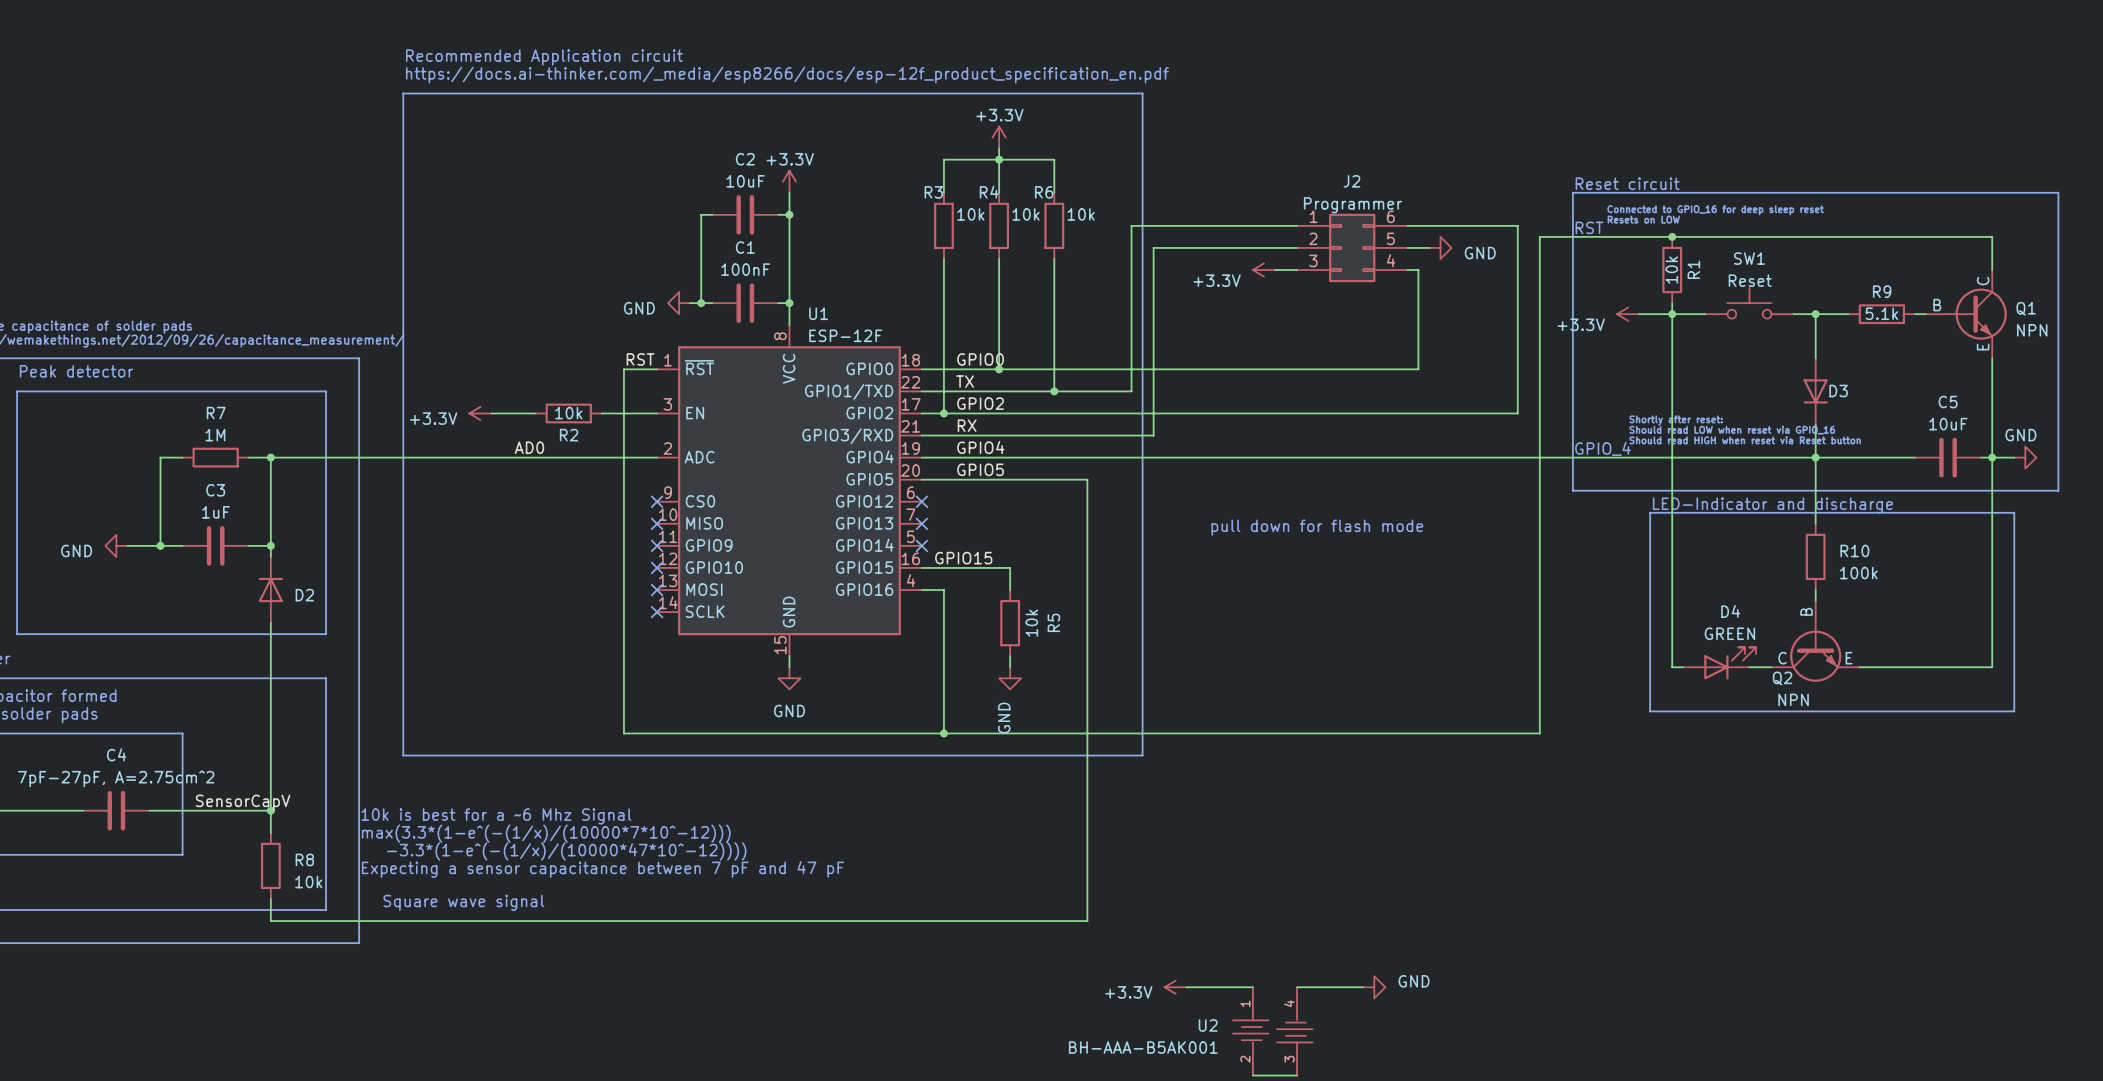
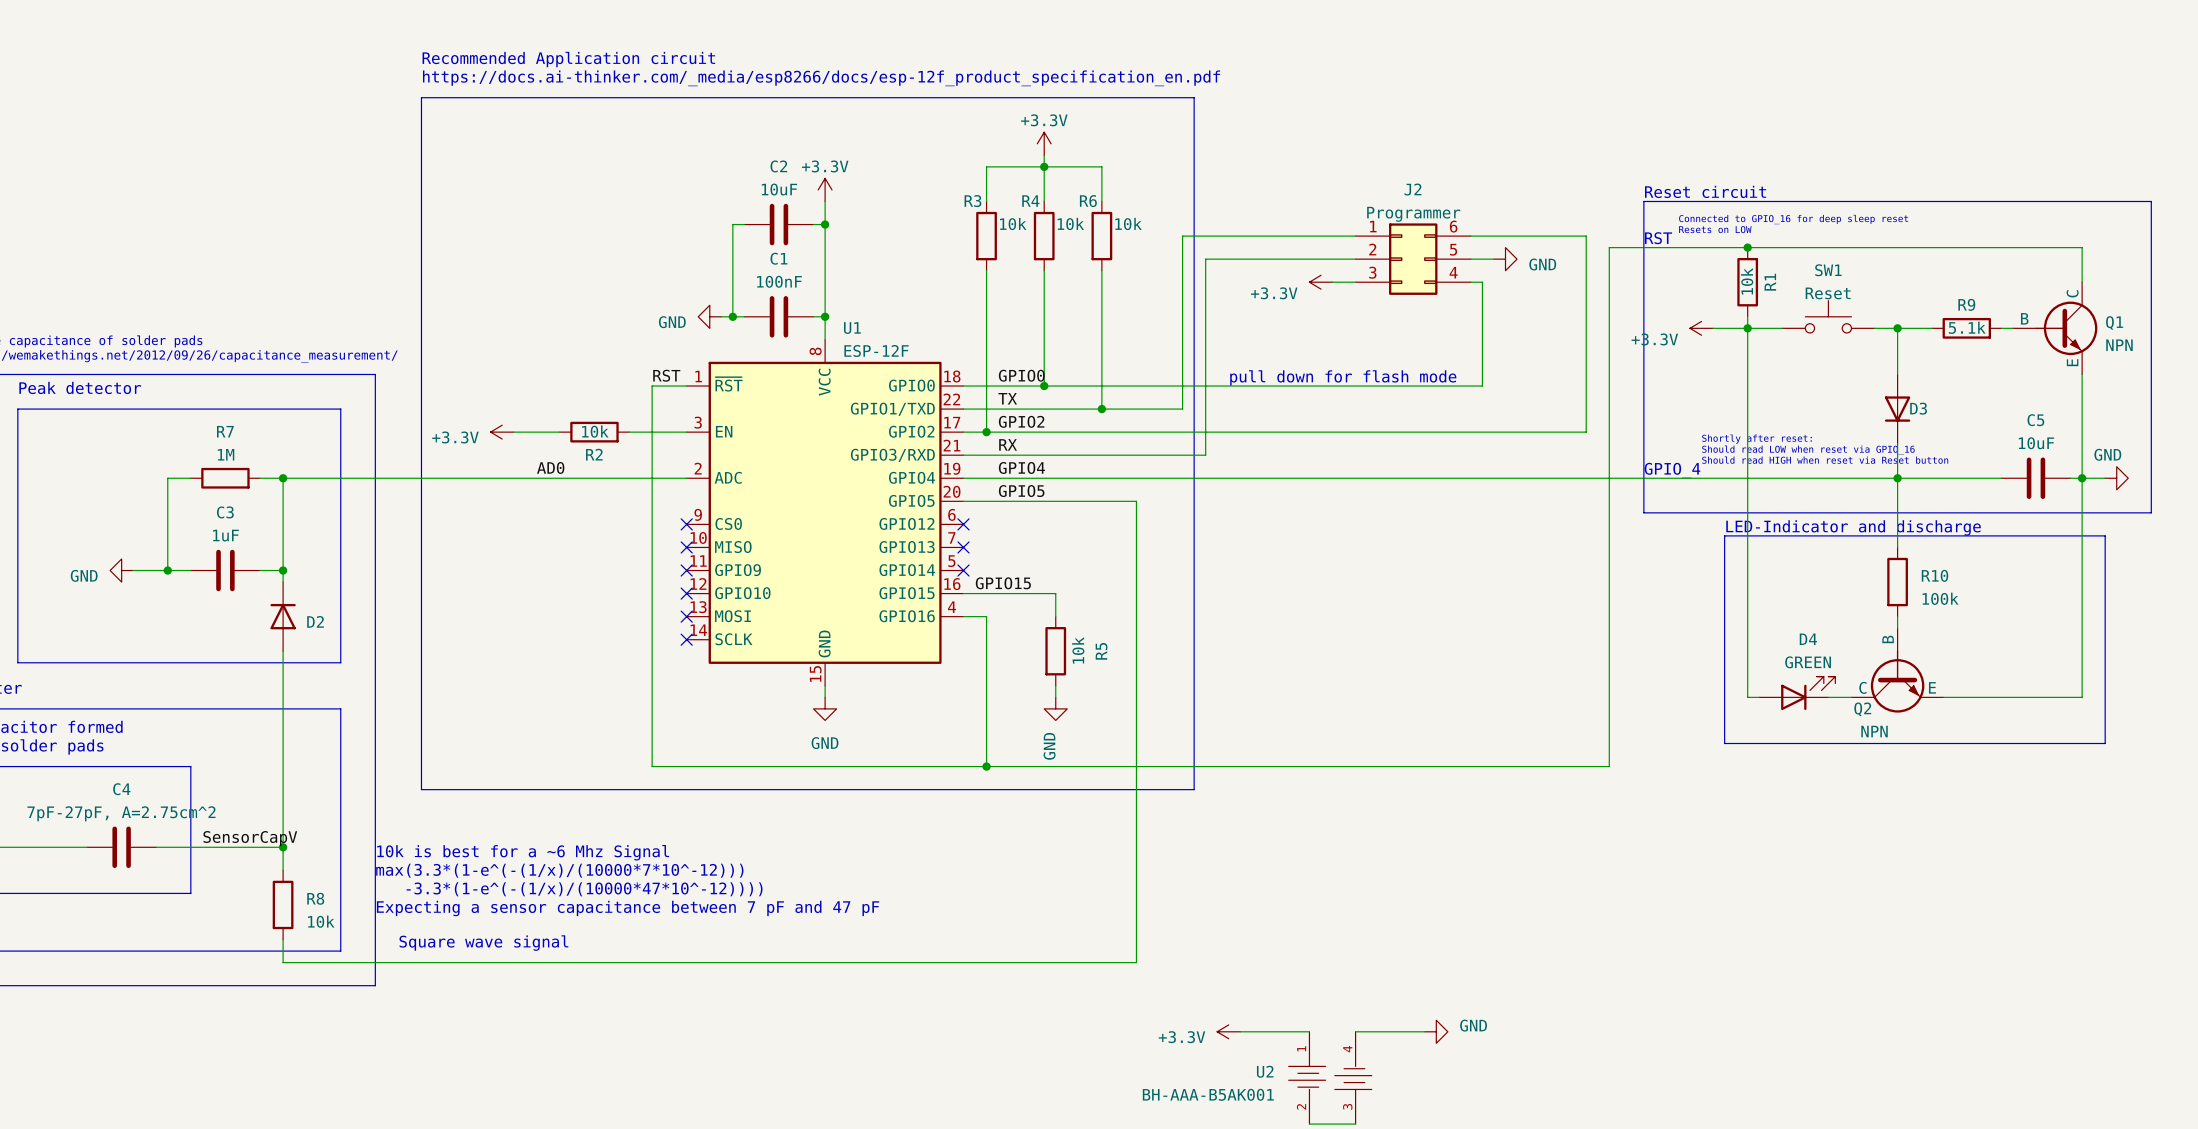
text position: pull down for flash mode (1317, 527) -> pull down for flash mode (1343, 377)

